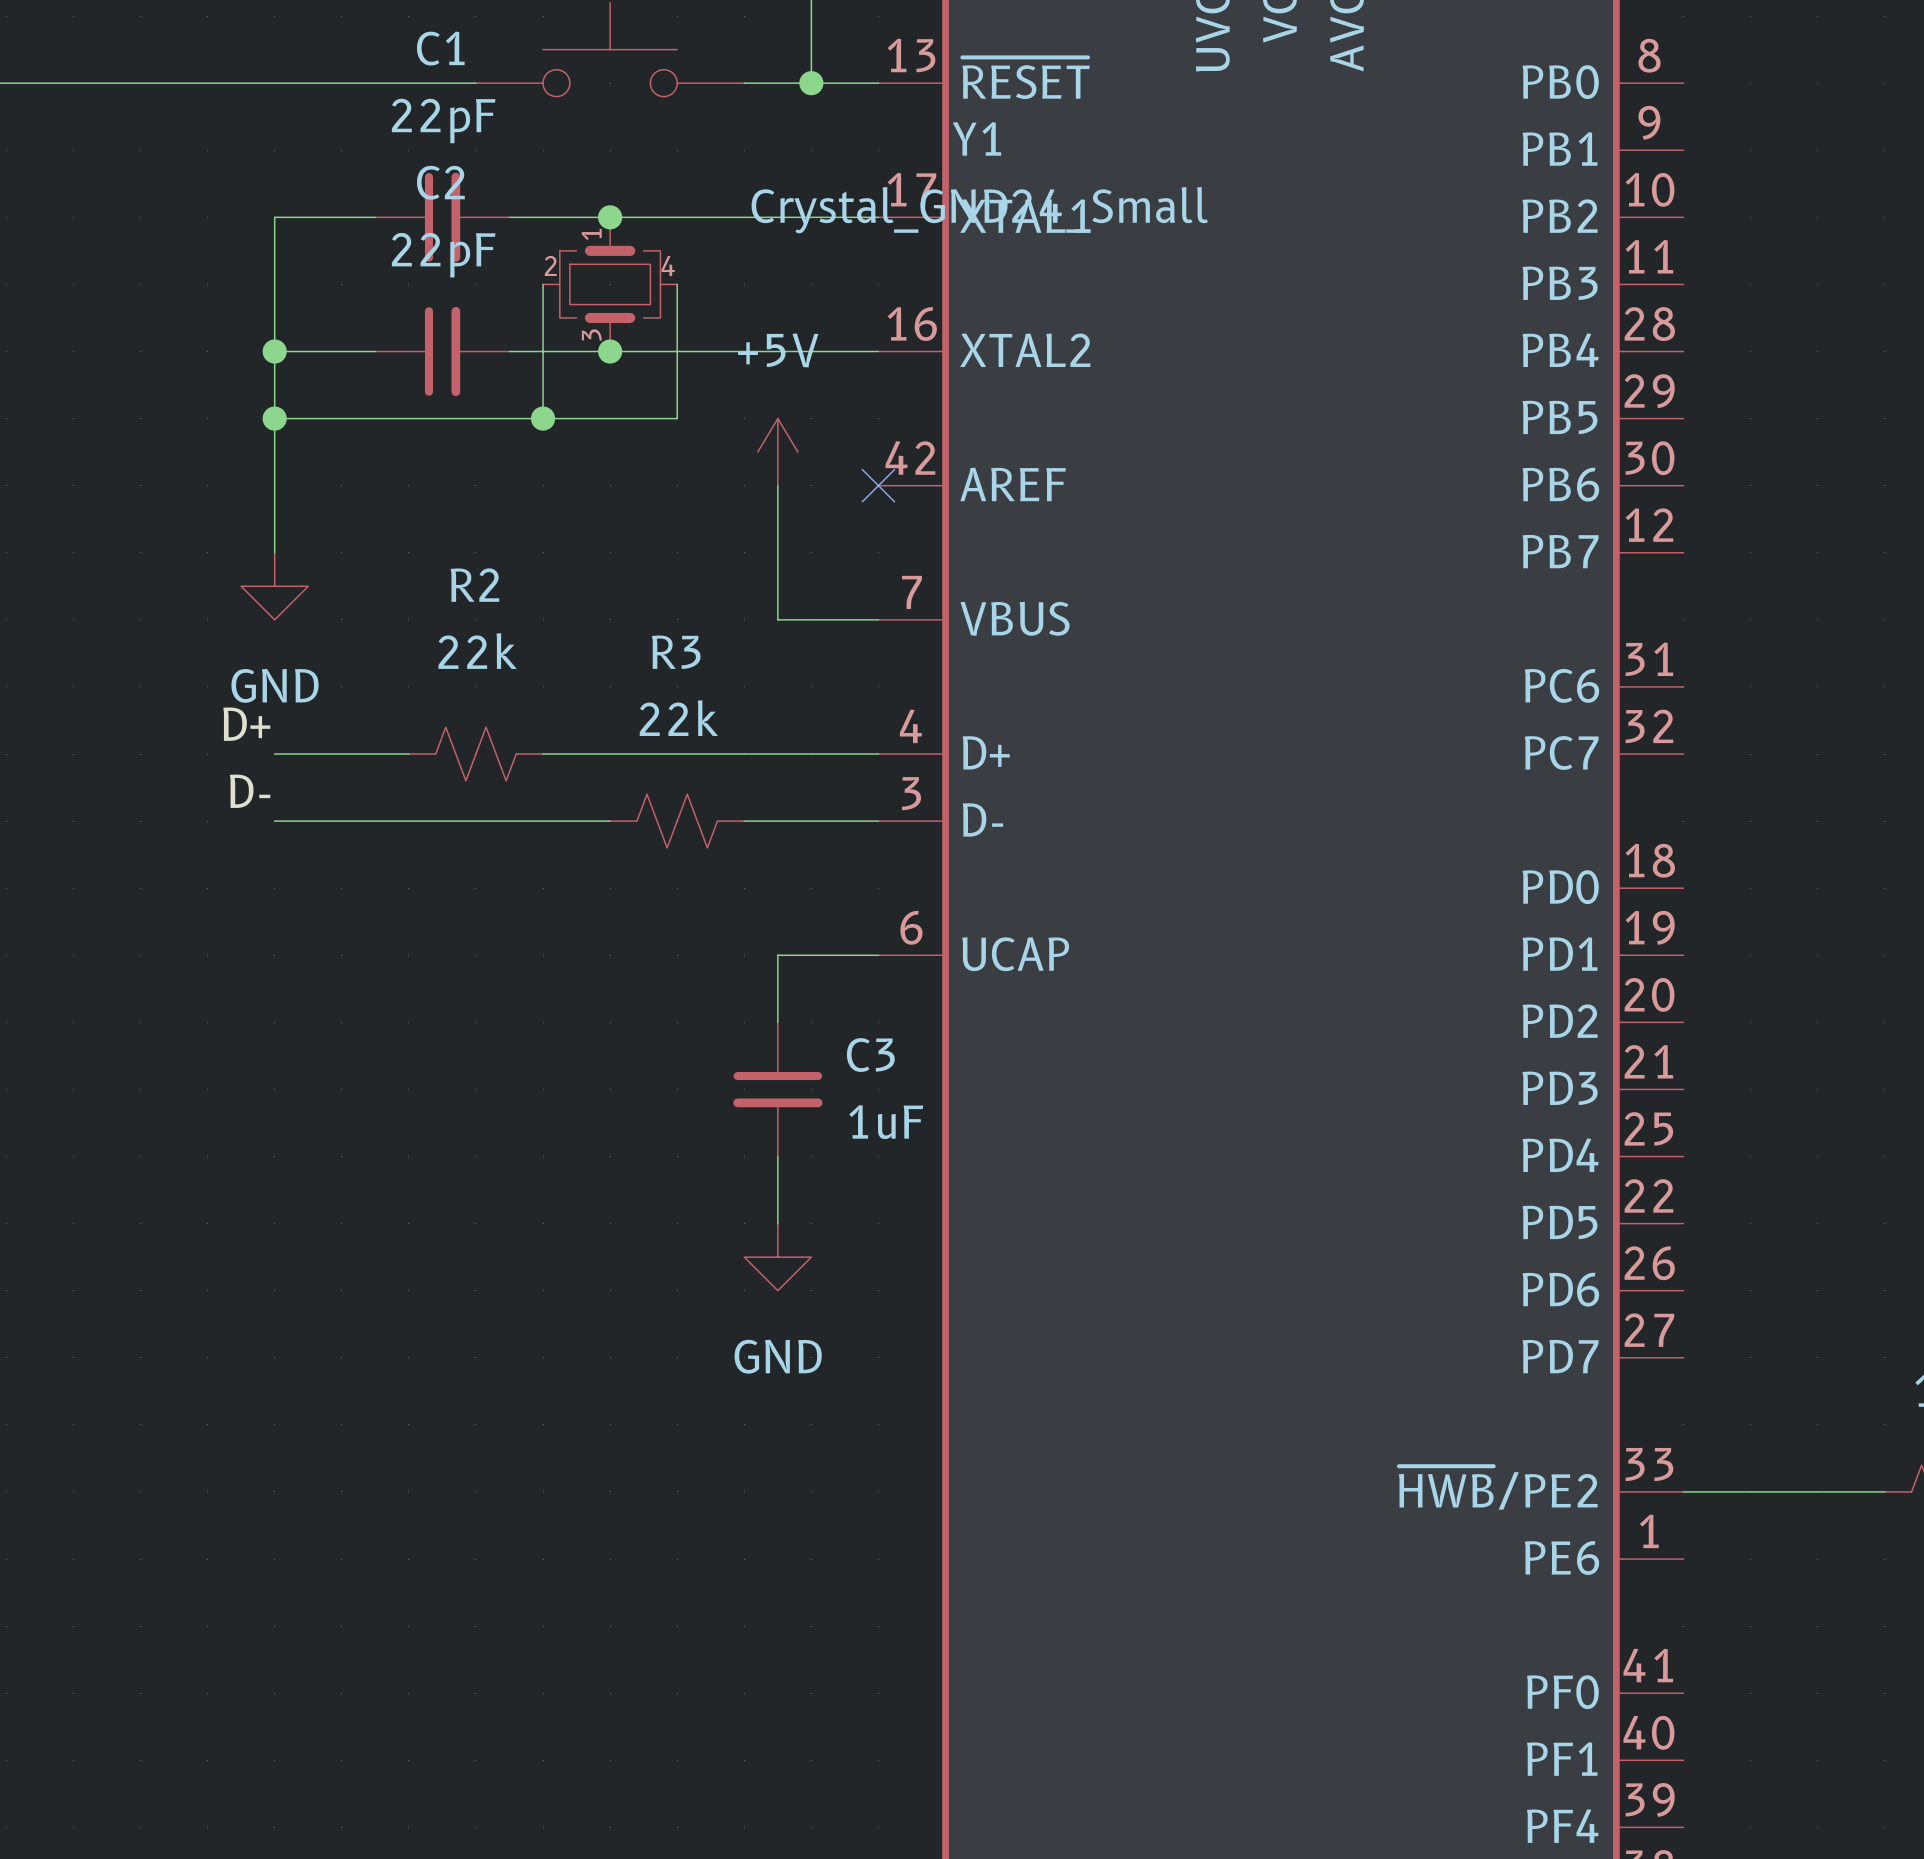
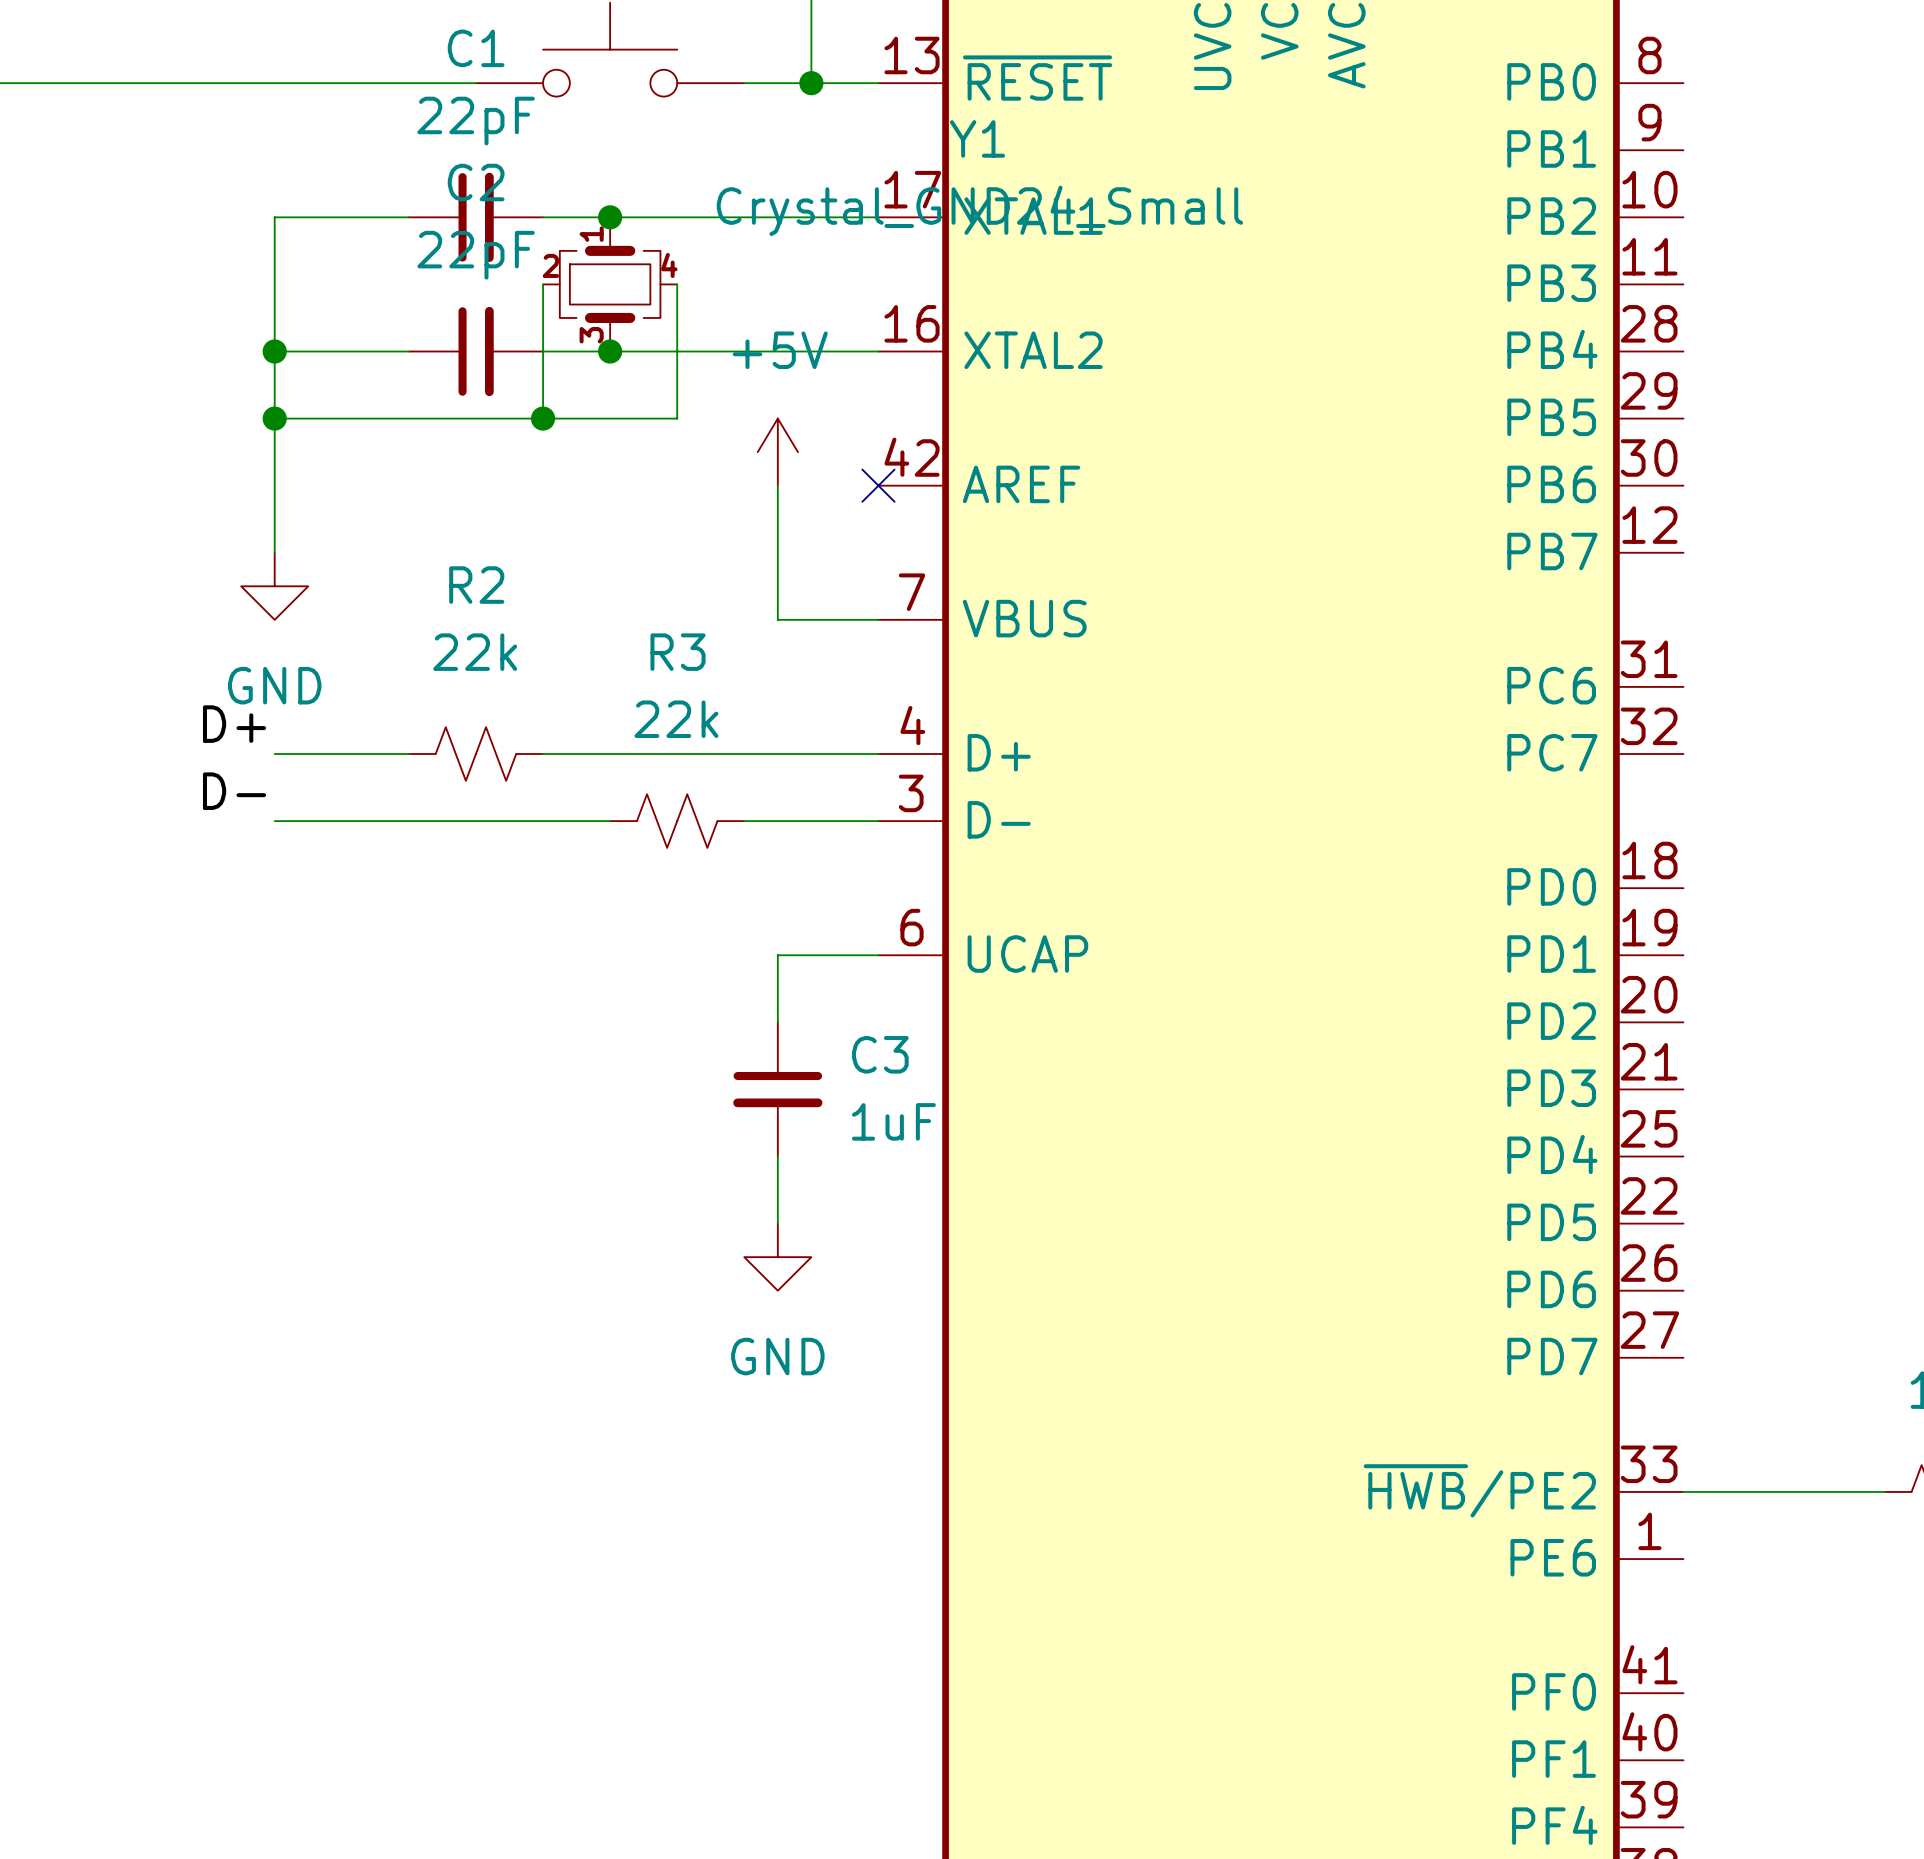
C1 position: (442, 217) -> (475, 217)
C2 position: (442, 351) -> (475, 351)

